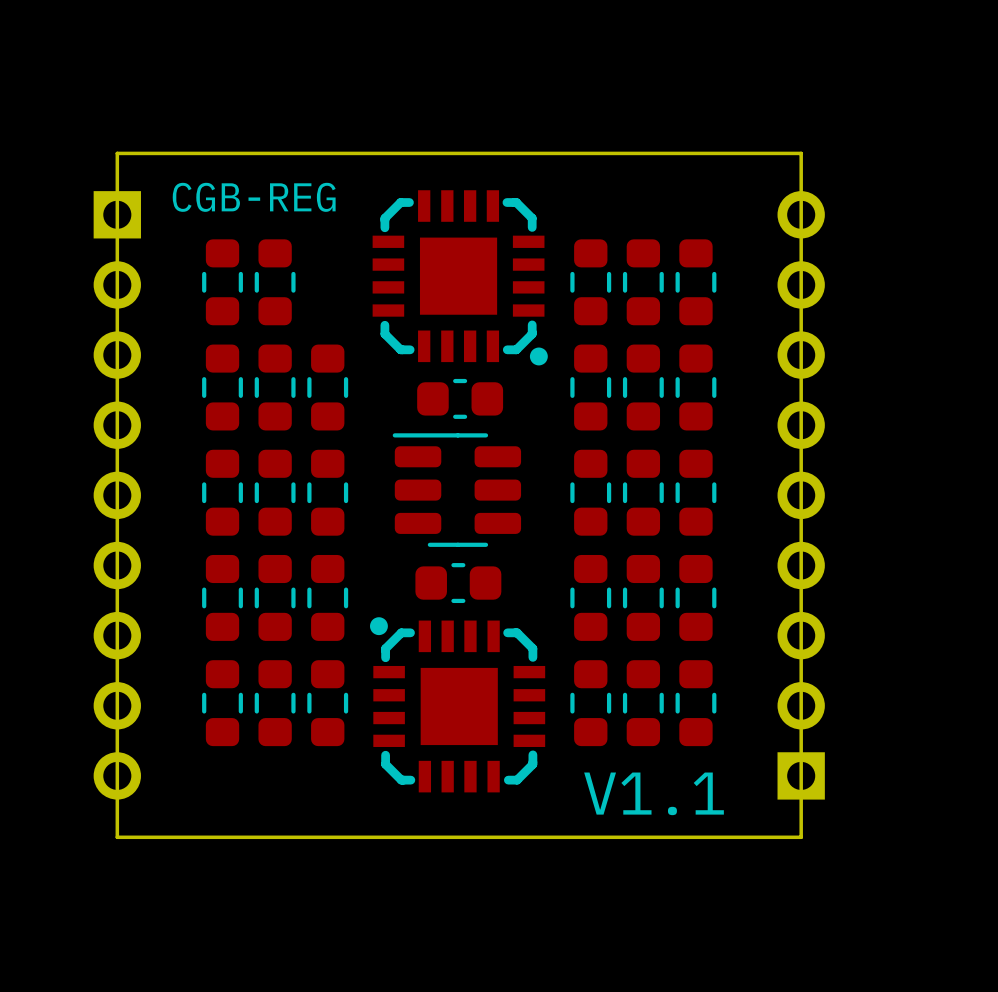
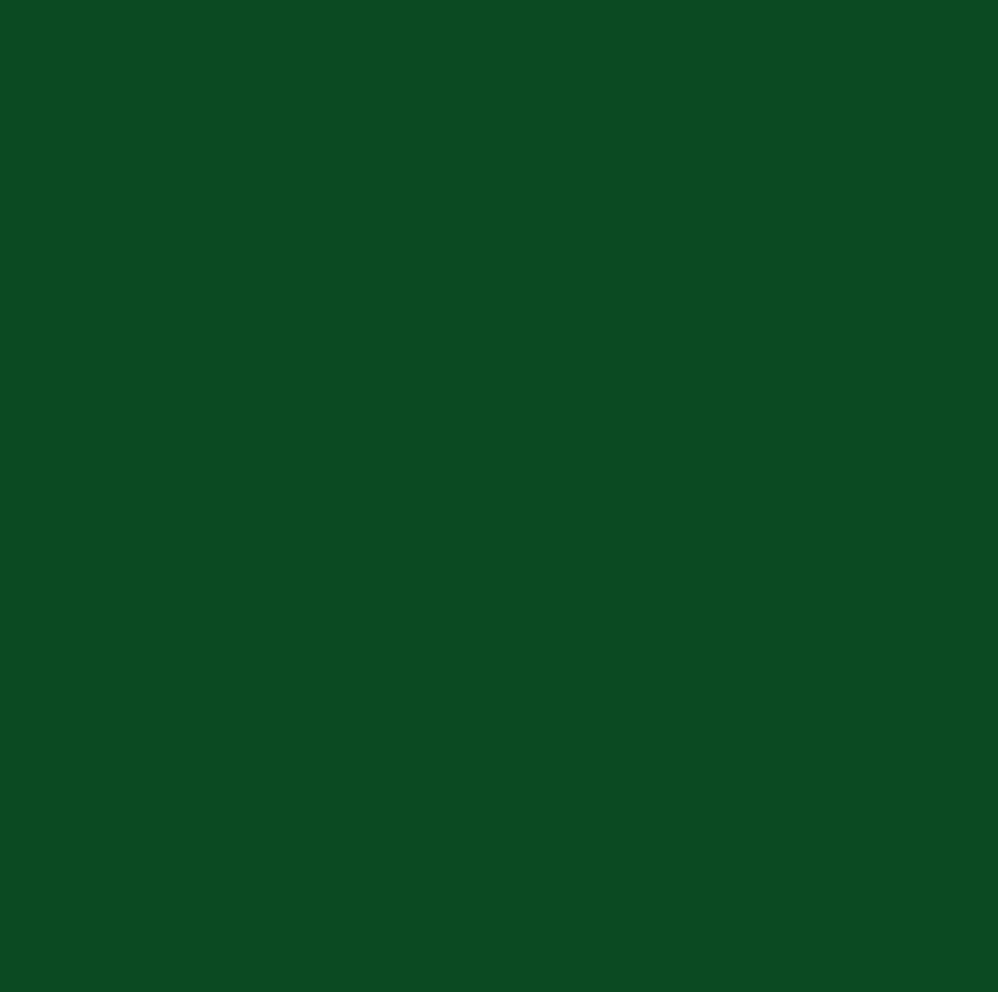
board edge: (117, 153) (801, 153) (801, 837) (117, 837) (117, 153) -> none
text: CGB-REG (254, 197) -> none
part: (460, 277) -> none
part: (222, 282) -> none
part: (275, 282) -> none
part: (590, 282) -> none
part: (643, 282) -> none
part: (695, 282) -> none
part: (222, 387) -> none
part: (275, 387) -> none
part: (327, 387) -> none
part: (590, 387) -> none
part: (643, 387) -> none
part: (695, 387) -> none
part: (460, 398) -> none
part: (456, 490) -> none
part: (222, 492) -> none
part: (275, 492) -> none
part: (327, 492) -> none
part: (590, 492) -> none
part: (643, 492) -> none
part: (695, 492) -> none
part: (117, 495) -> none
part: (801, 495) -> none
part: (458, 583) -> none
part: (222, 597) -> none
part: (275, 597) -> none
part: (327, 597) -> none
part: (590, 597) -> none
part: (643, 597) -> none
part: (695, 597) -> none
part: (222, 703) -> none
part: (275, 703) -> none
part: (327, 703) -> none
part: (590, 703) -> none
part: (643, 703) -> none
part: (695, 703) -> none
part: (457, 704) -> none
text: V1.1 (654, 793) -> none

